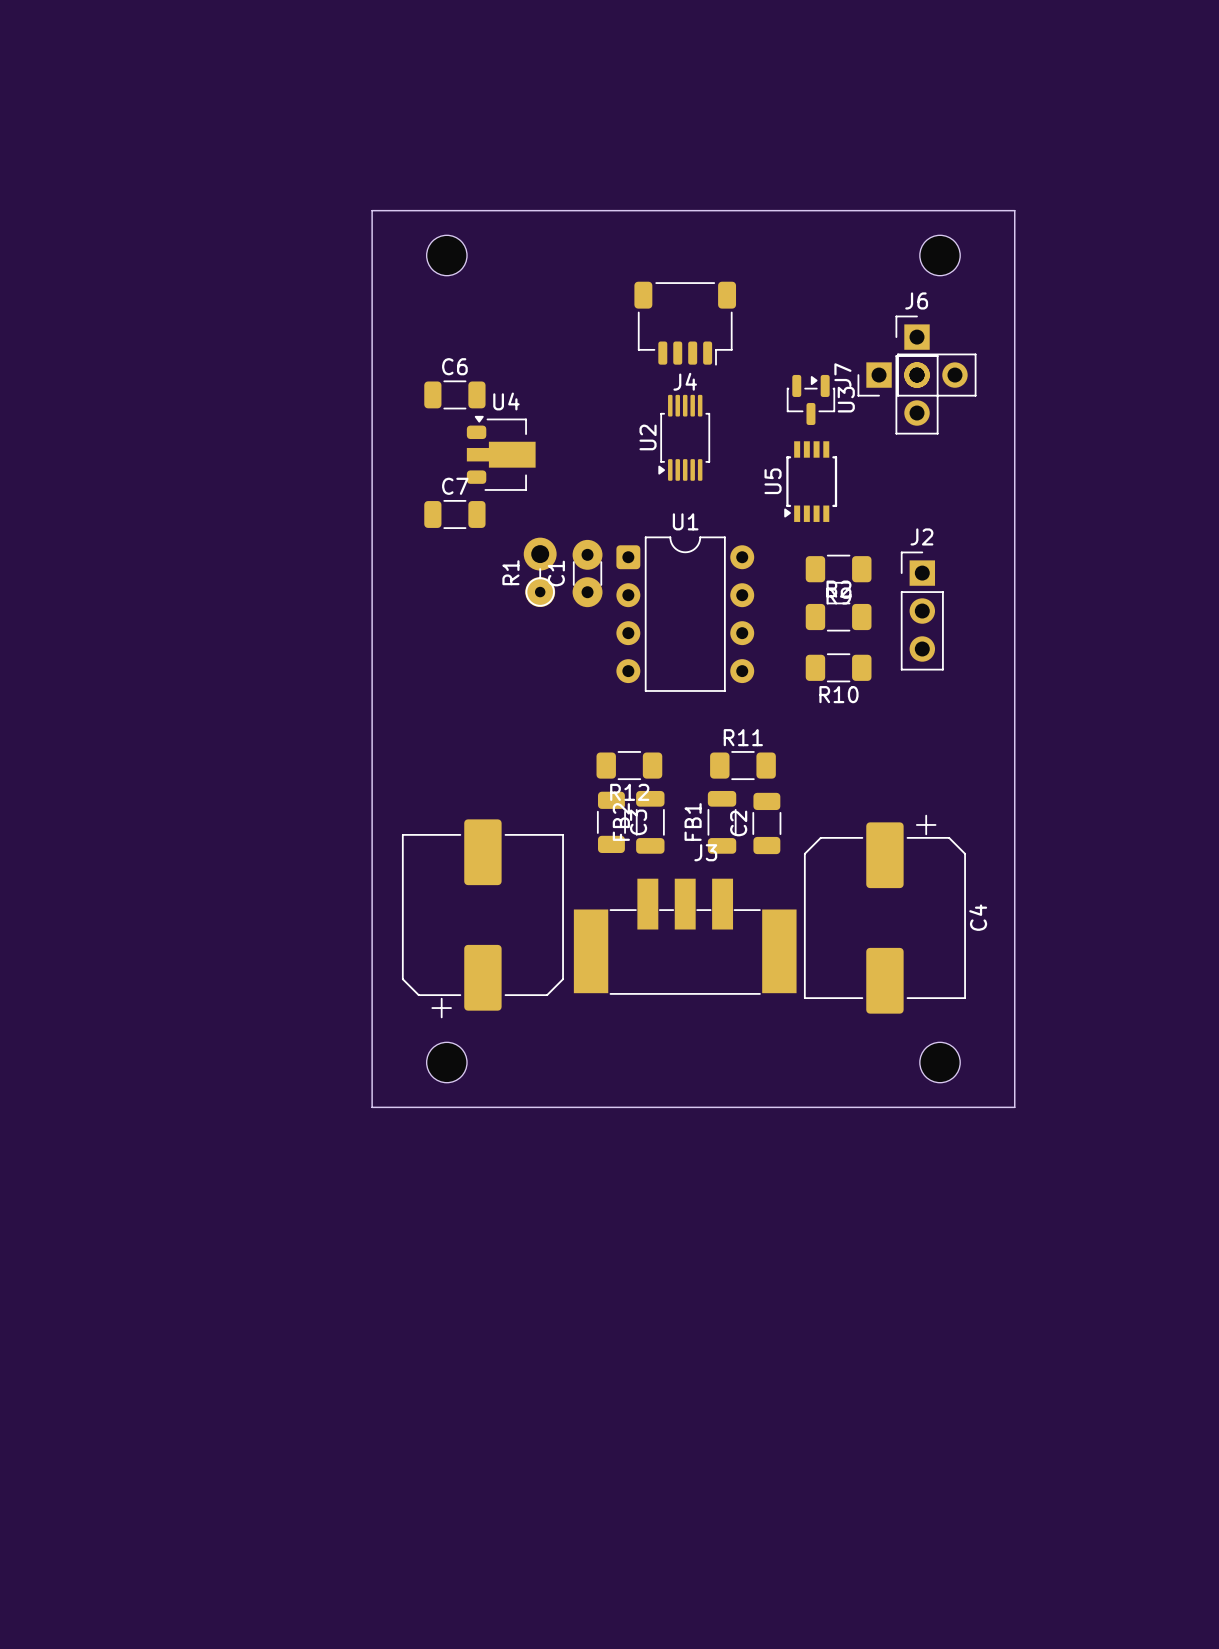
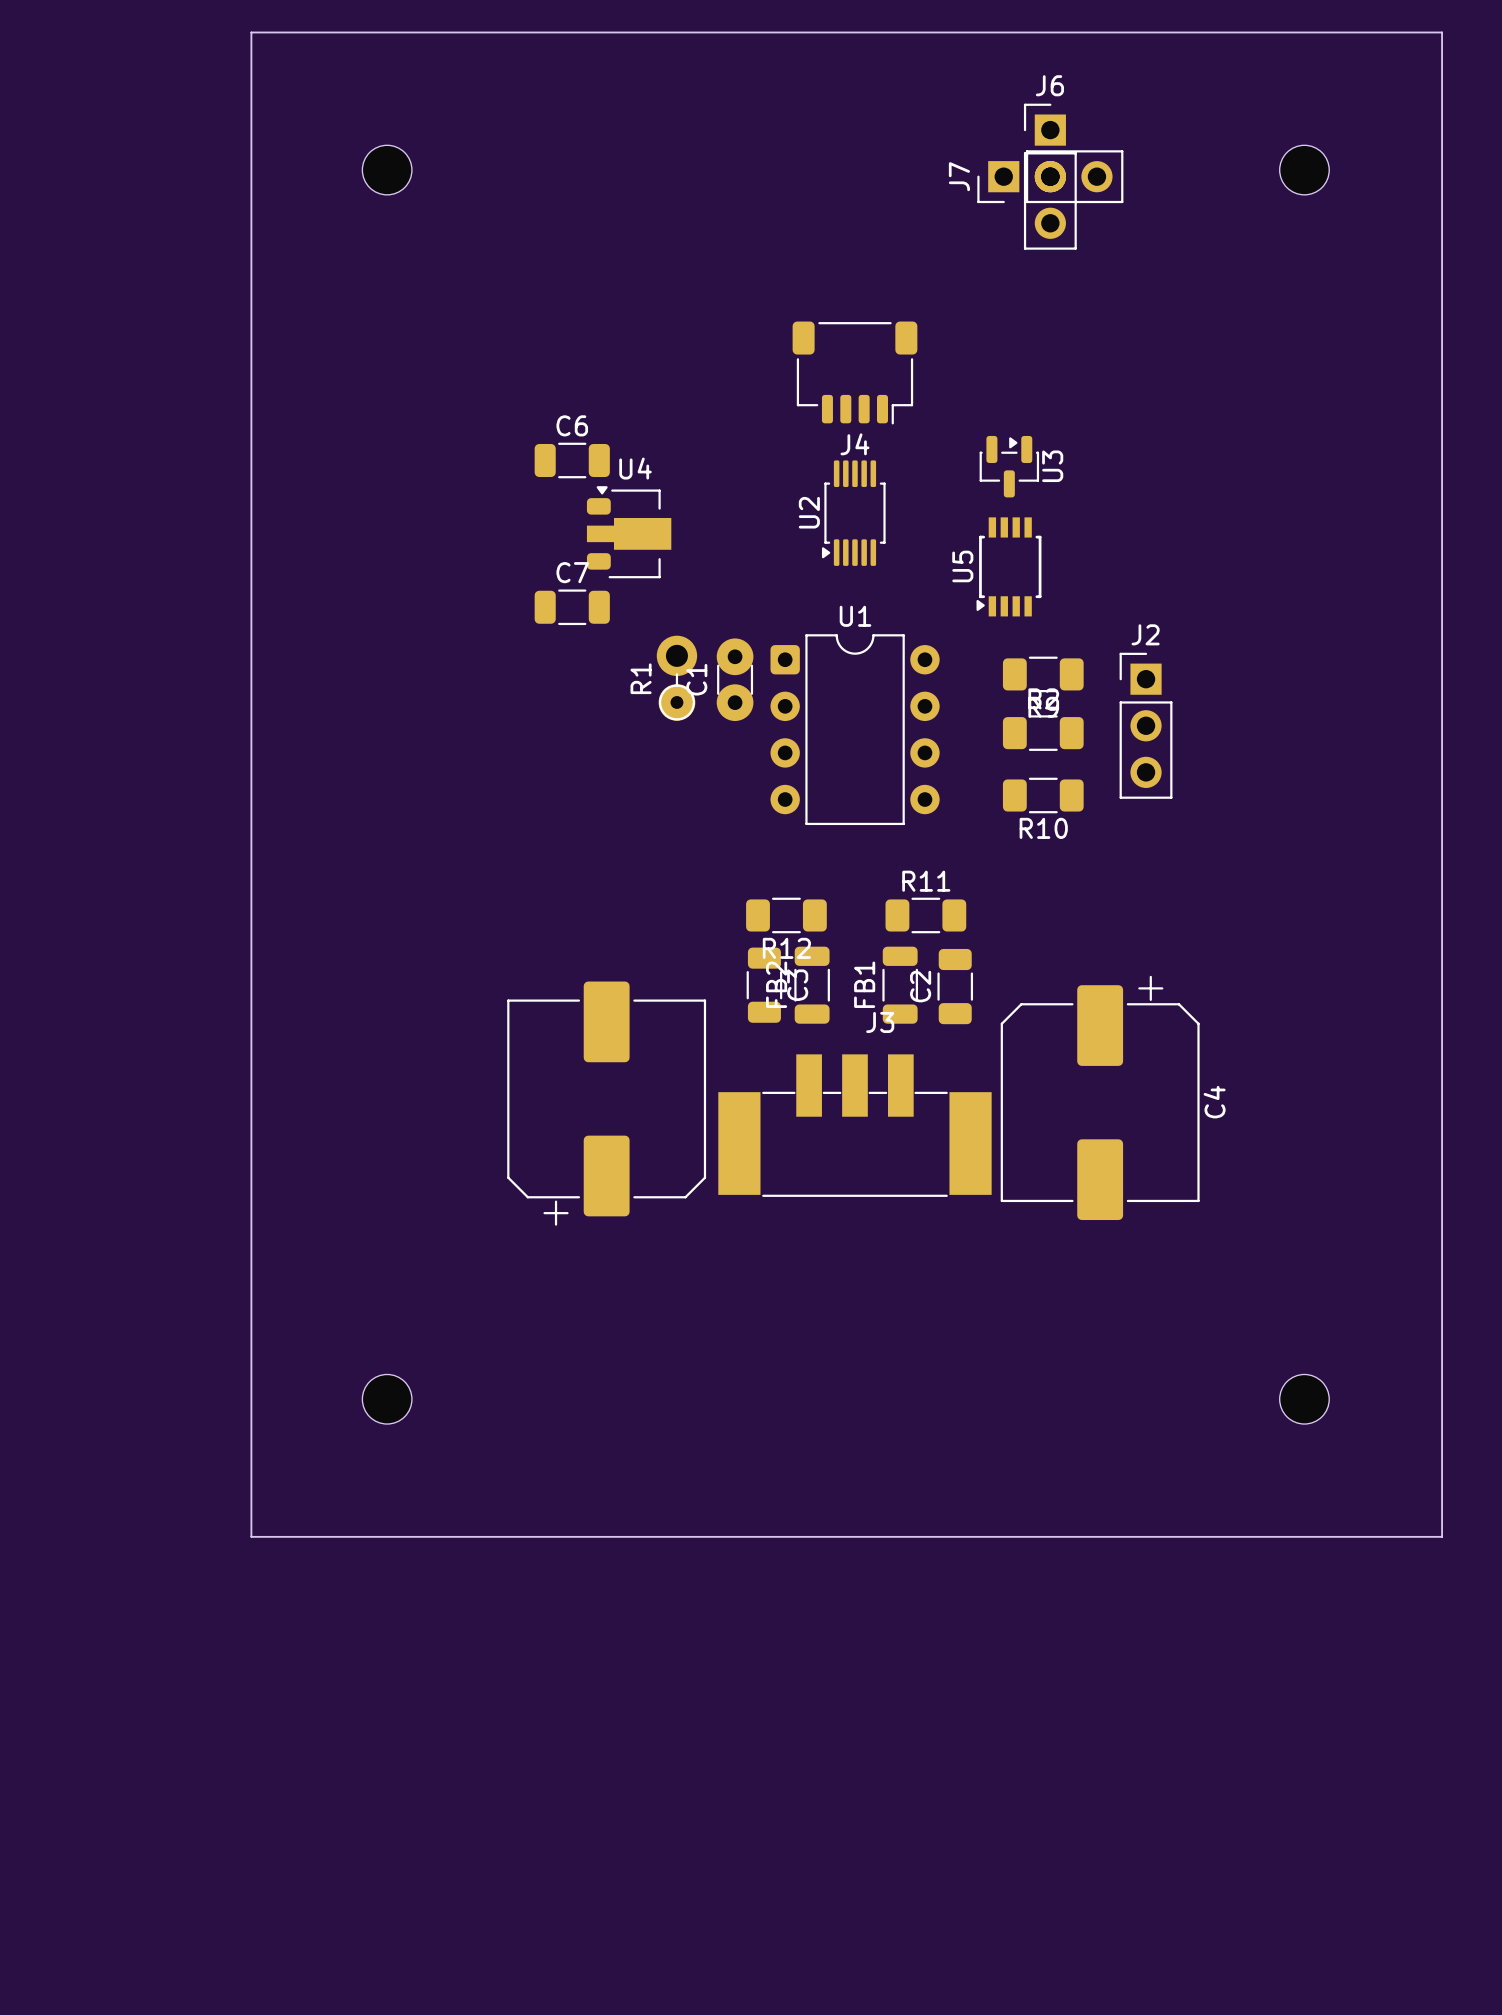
board edge: none -> (251, 32) (1442, 32) (1442, 1536) (251, 1536) (251, 32)
board edge: (372, 210) (1014, 210) (1014, 1107) (372, 1107) (372, 210) -> none
part position: (446, 255) -> (387, 170)
part position: (940, 255) -> (1304, 170)
J7 position: (917, 375) -> (1050, 176)
J6 position: (917, 375) -> (1050, 176)
part position: (446, 1062) -> (387, 1399)
part position: (940, 1062) -> (1304, 1399)

